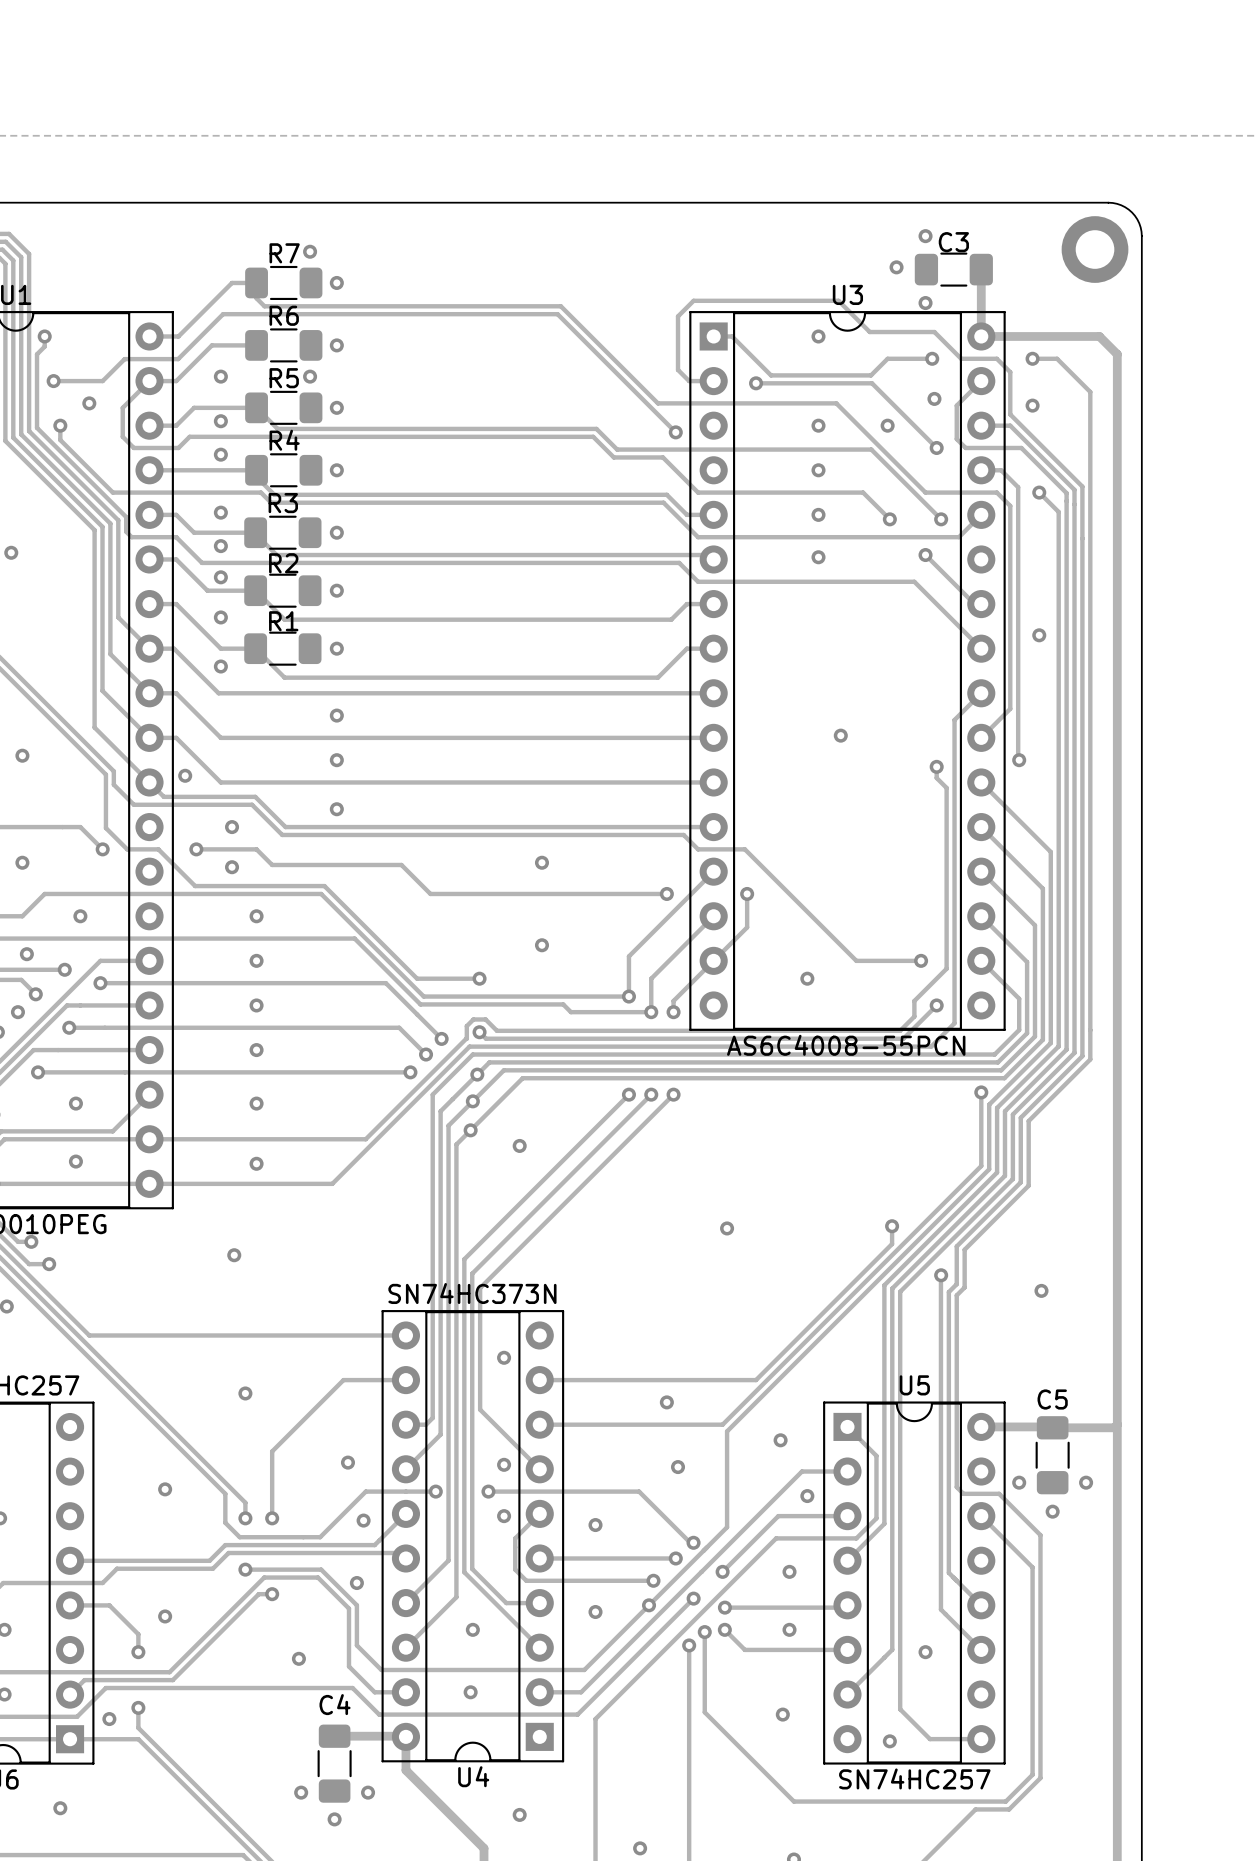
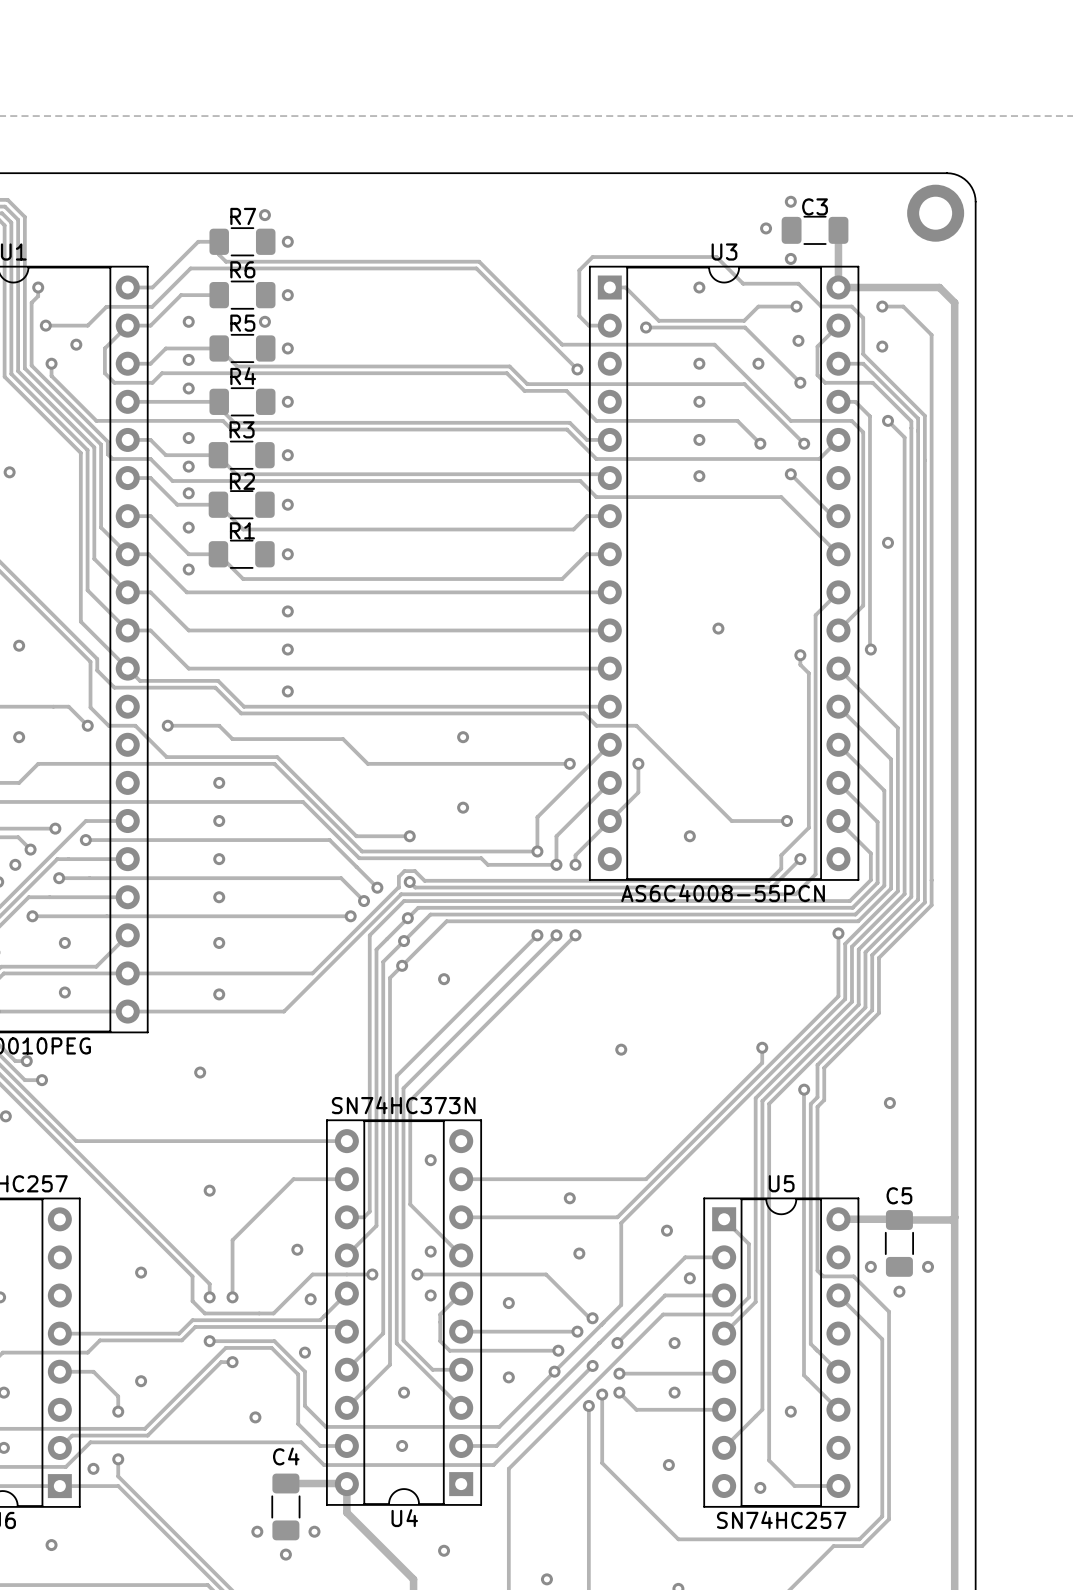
via: (185, 775) -> none
via: (232, 827) -> none
via: (232, 867) -> none
via: (80, 916) -> none
via: (26, 954) -> none

